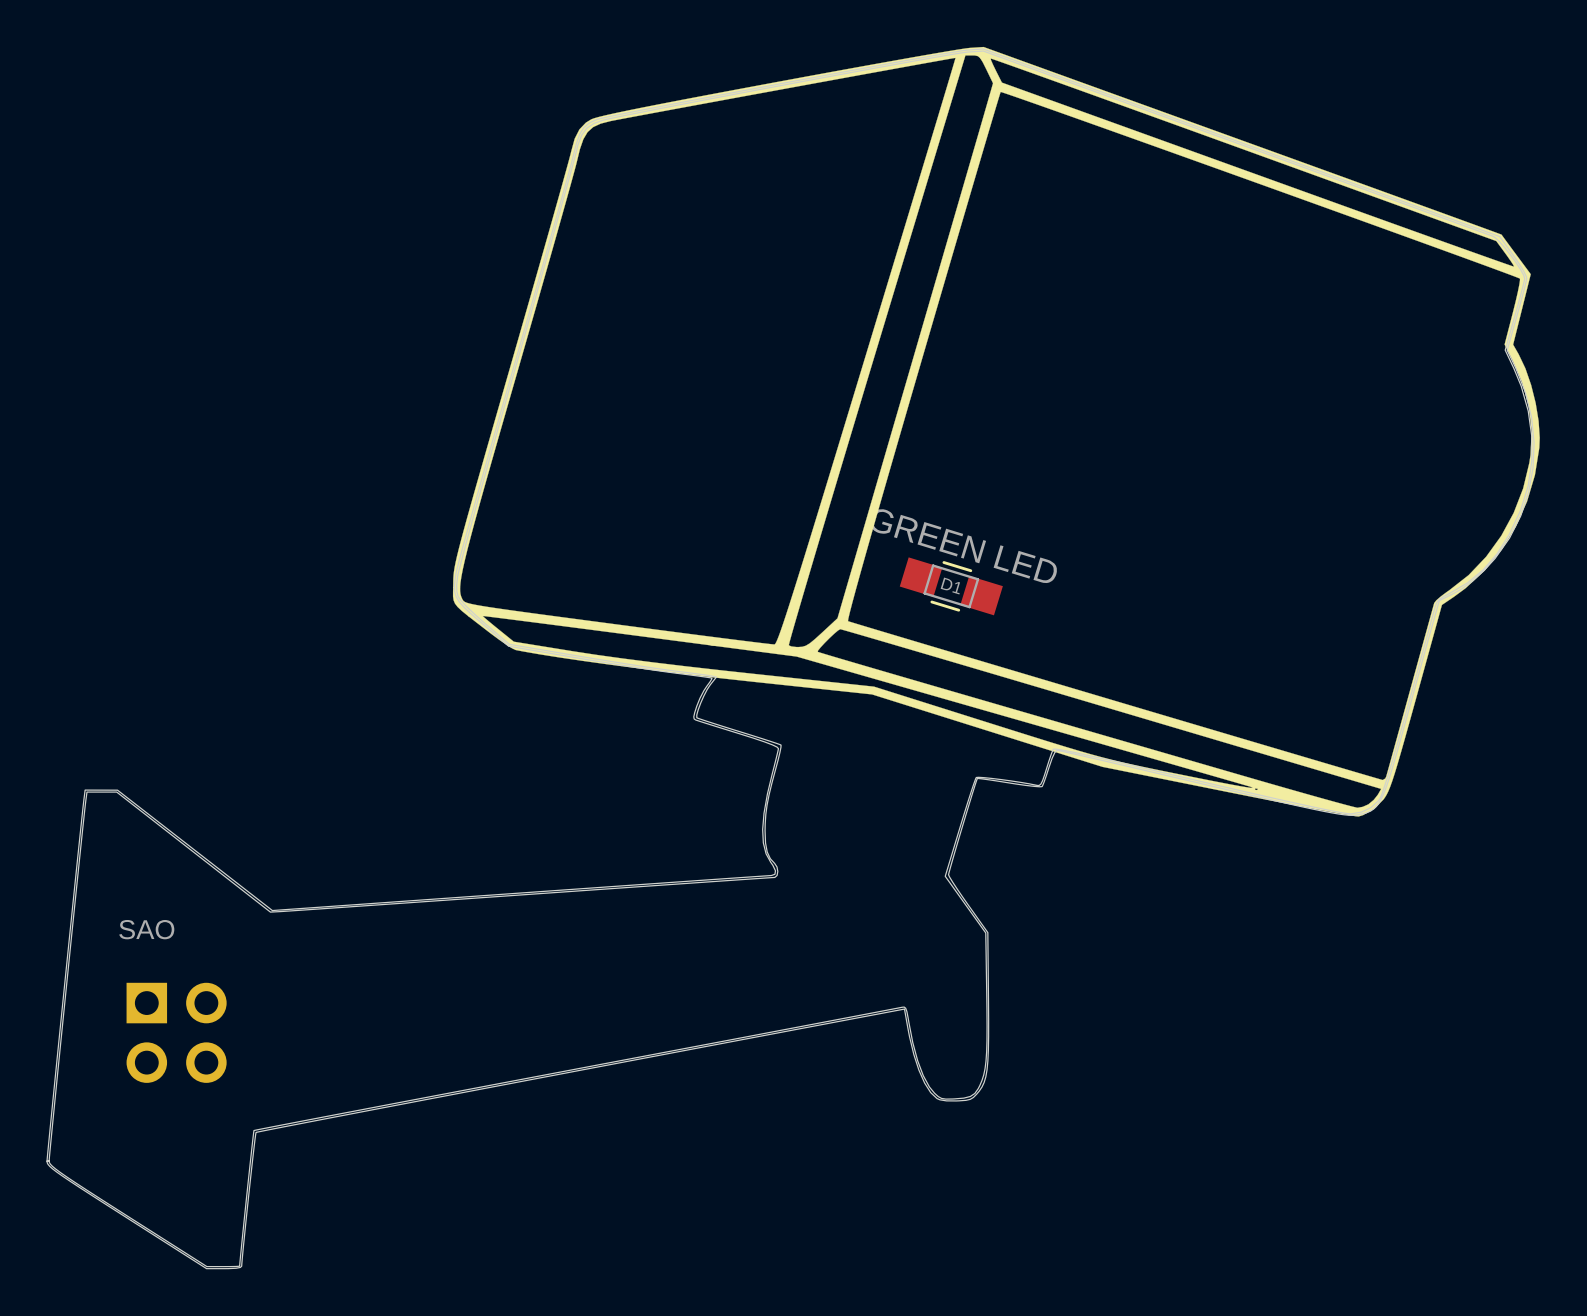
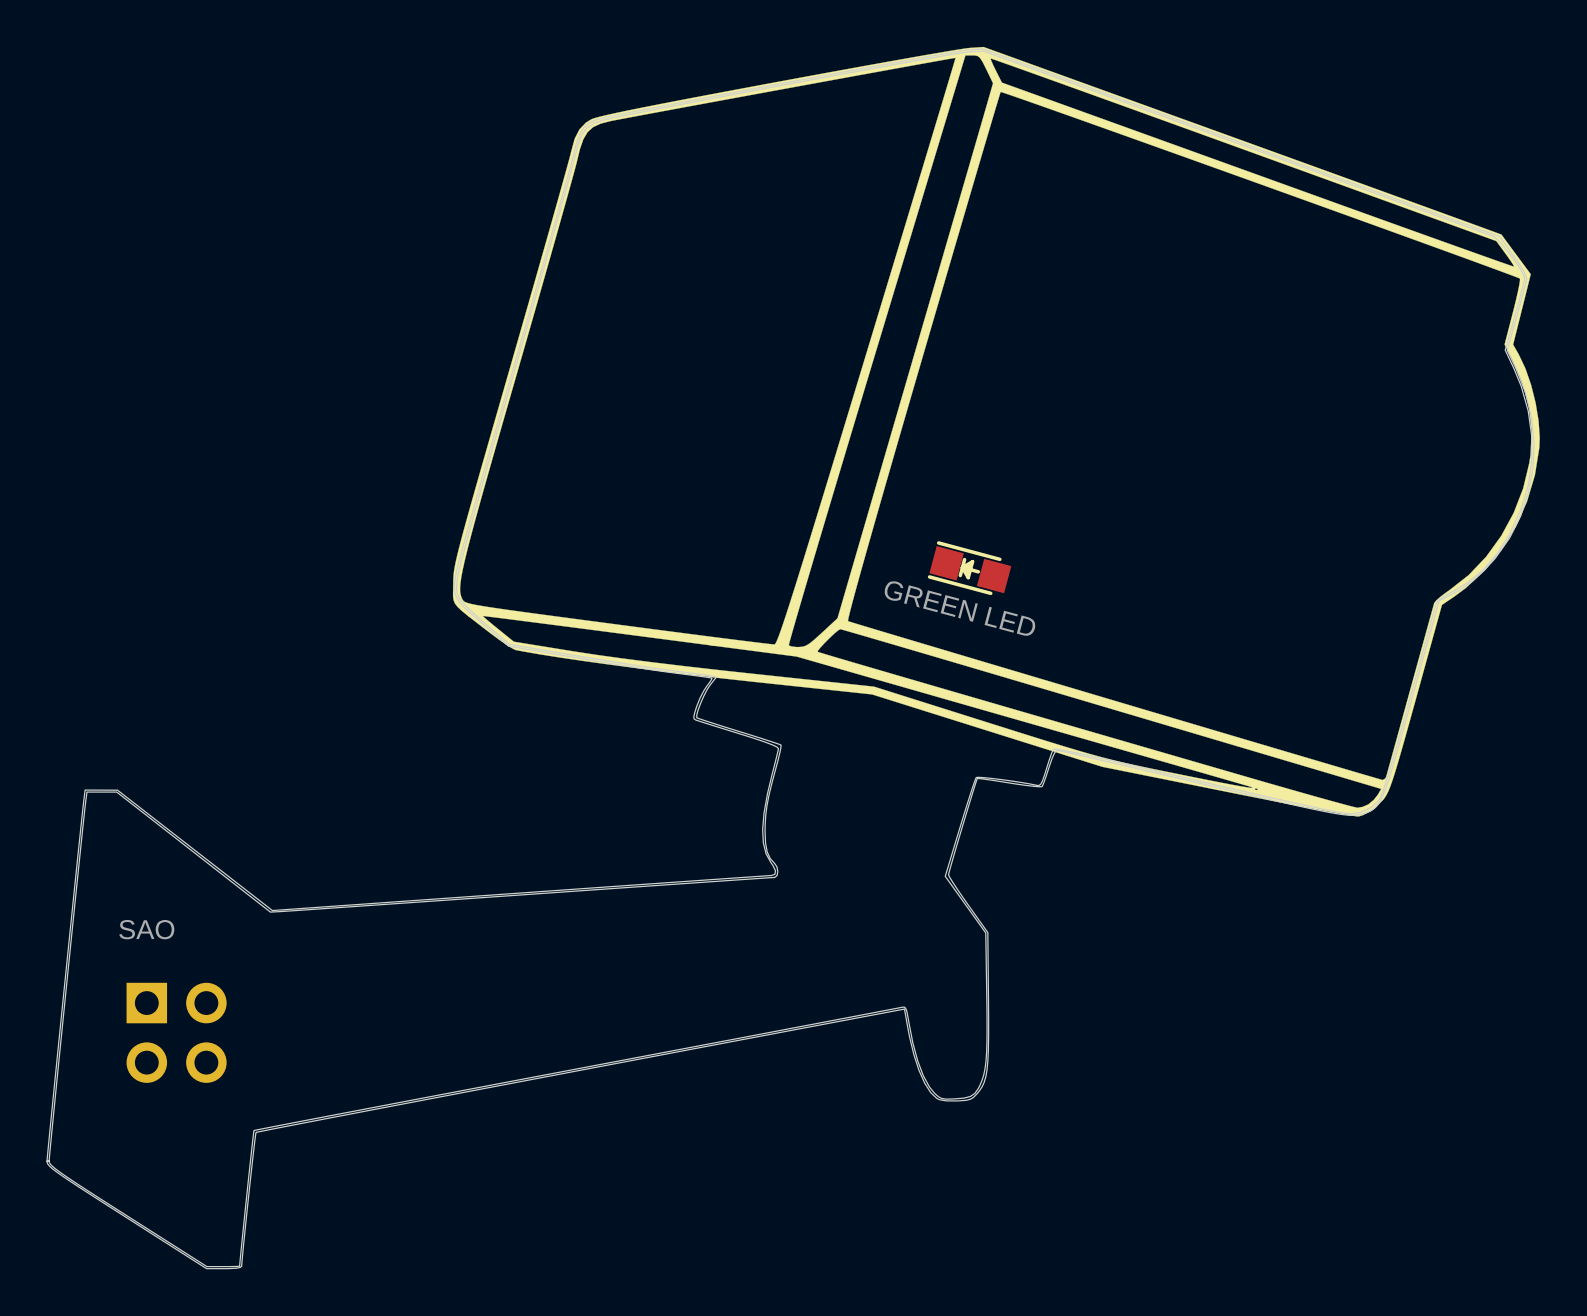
part: none -> GREEN LED (969, 568)
D1: GREEN LED (951, 586) -> none

